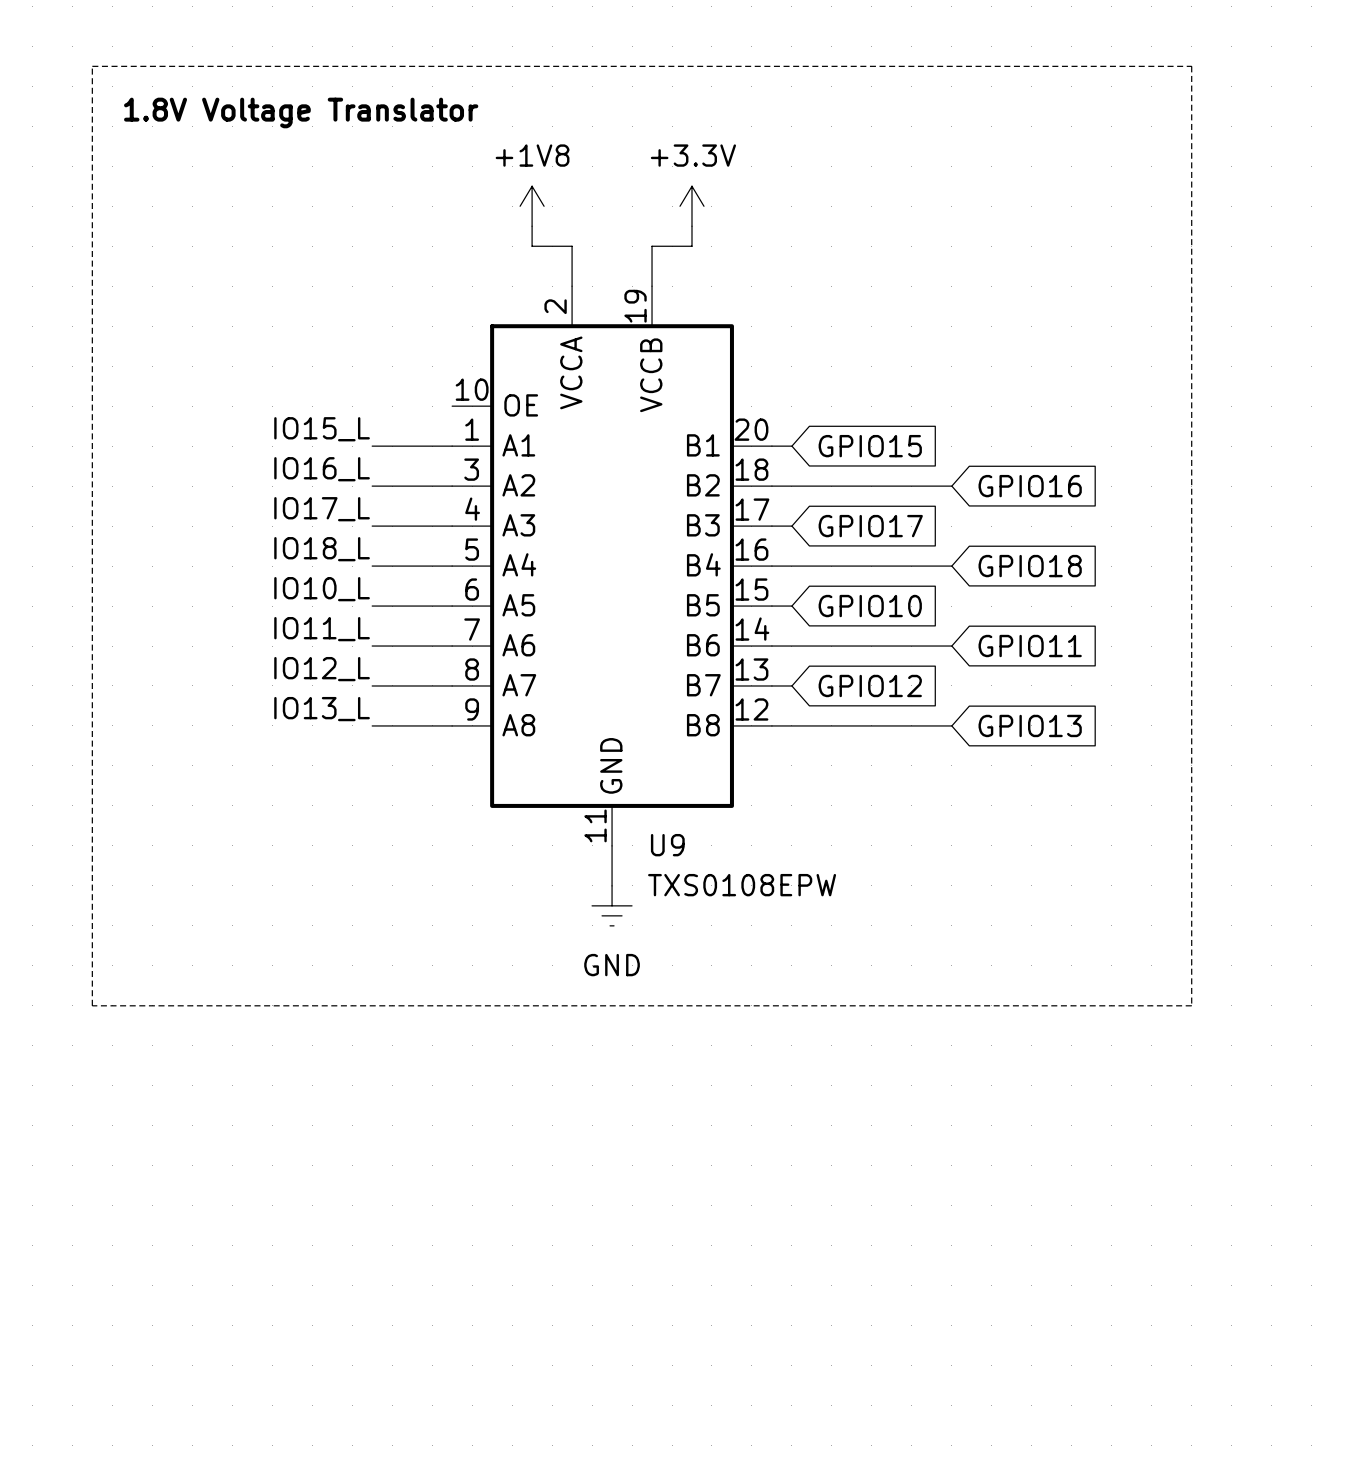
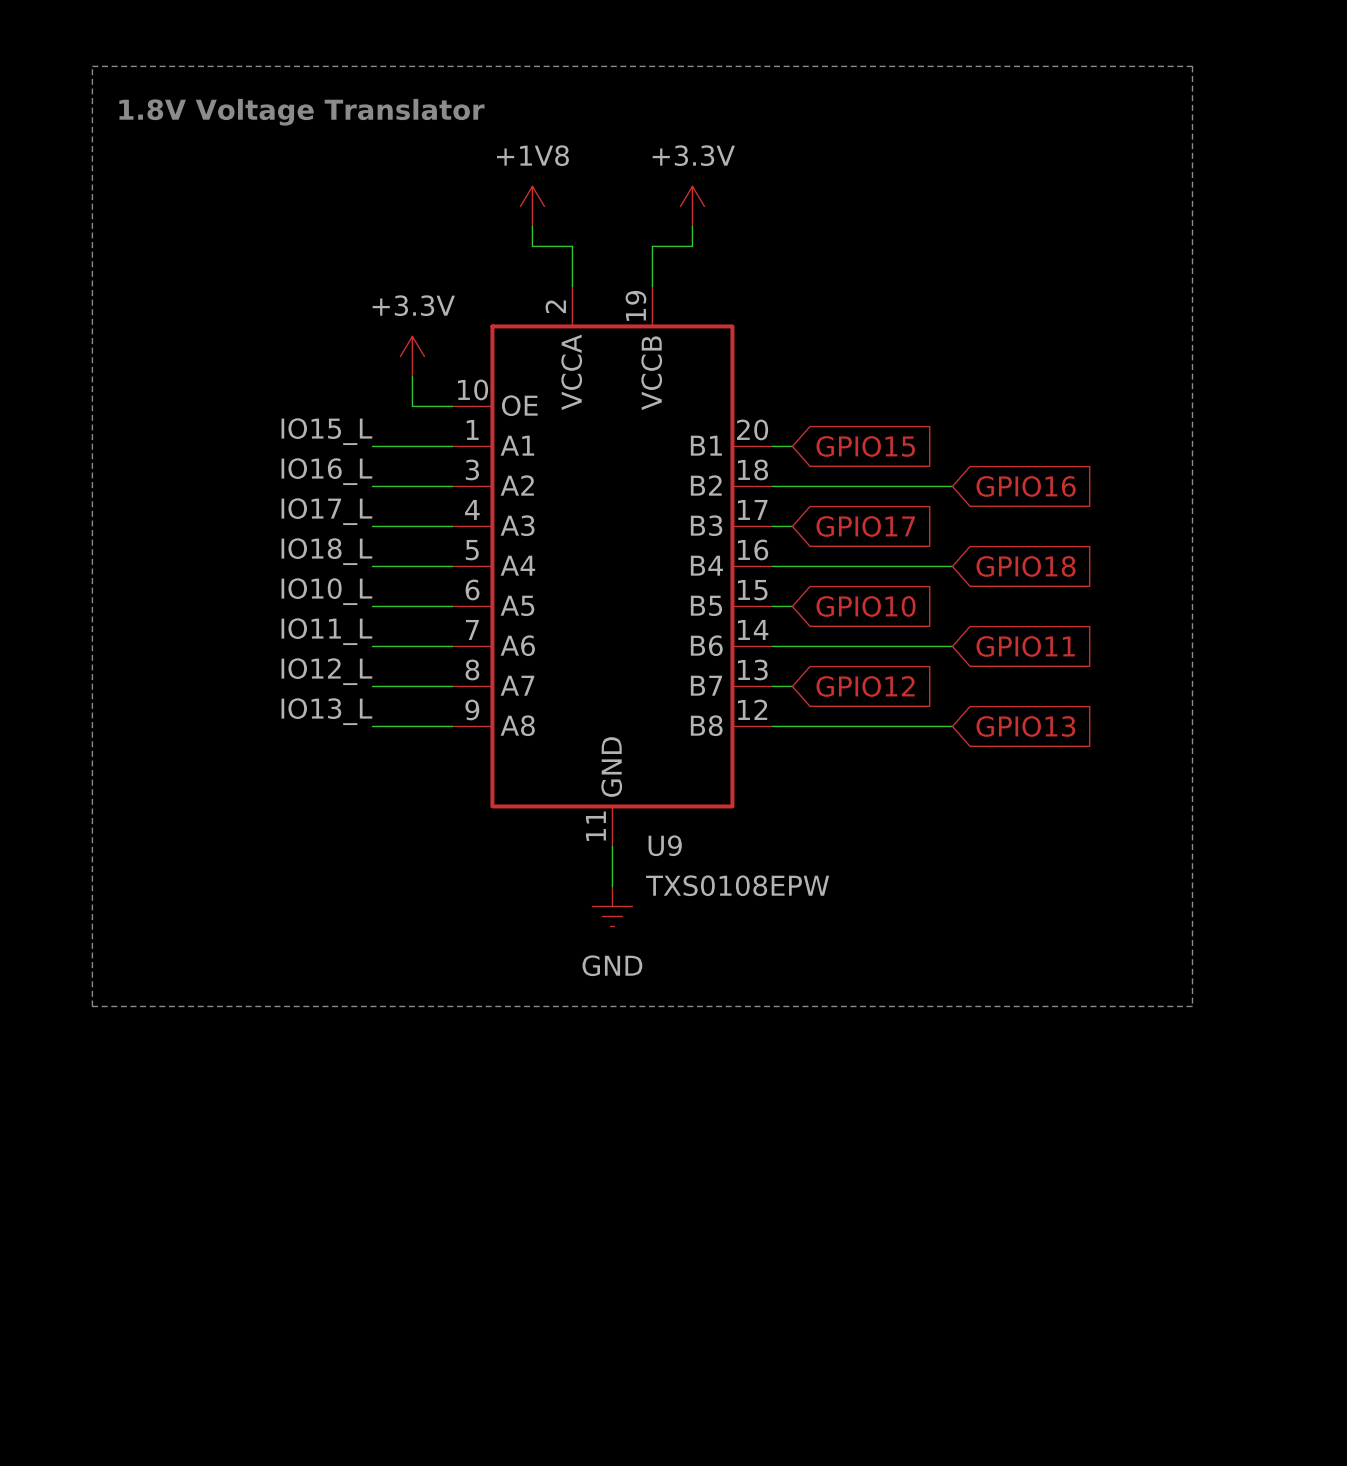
power symbol: none -> +3.3V (412, 356)
wire: none -> (412, 376) (412, 406) (452, 406)

